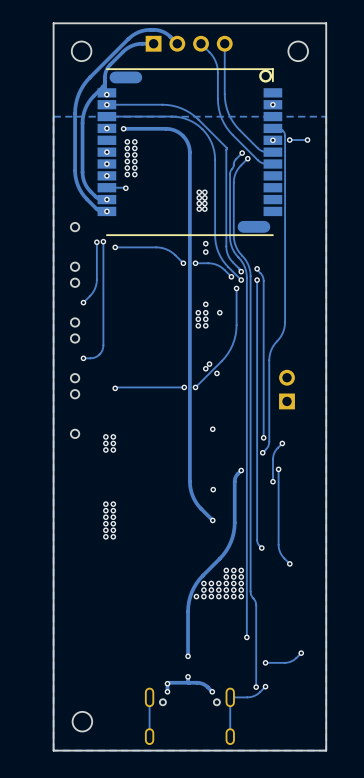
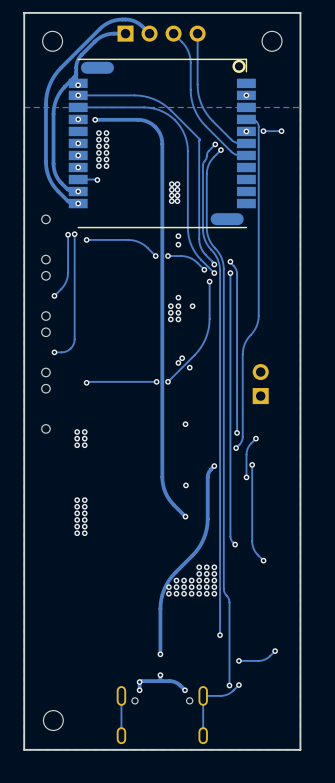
via: none -> (168, 587)

